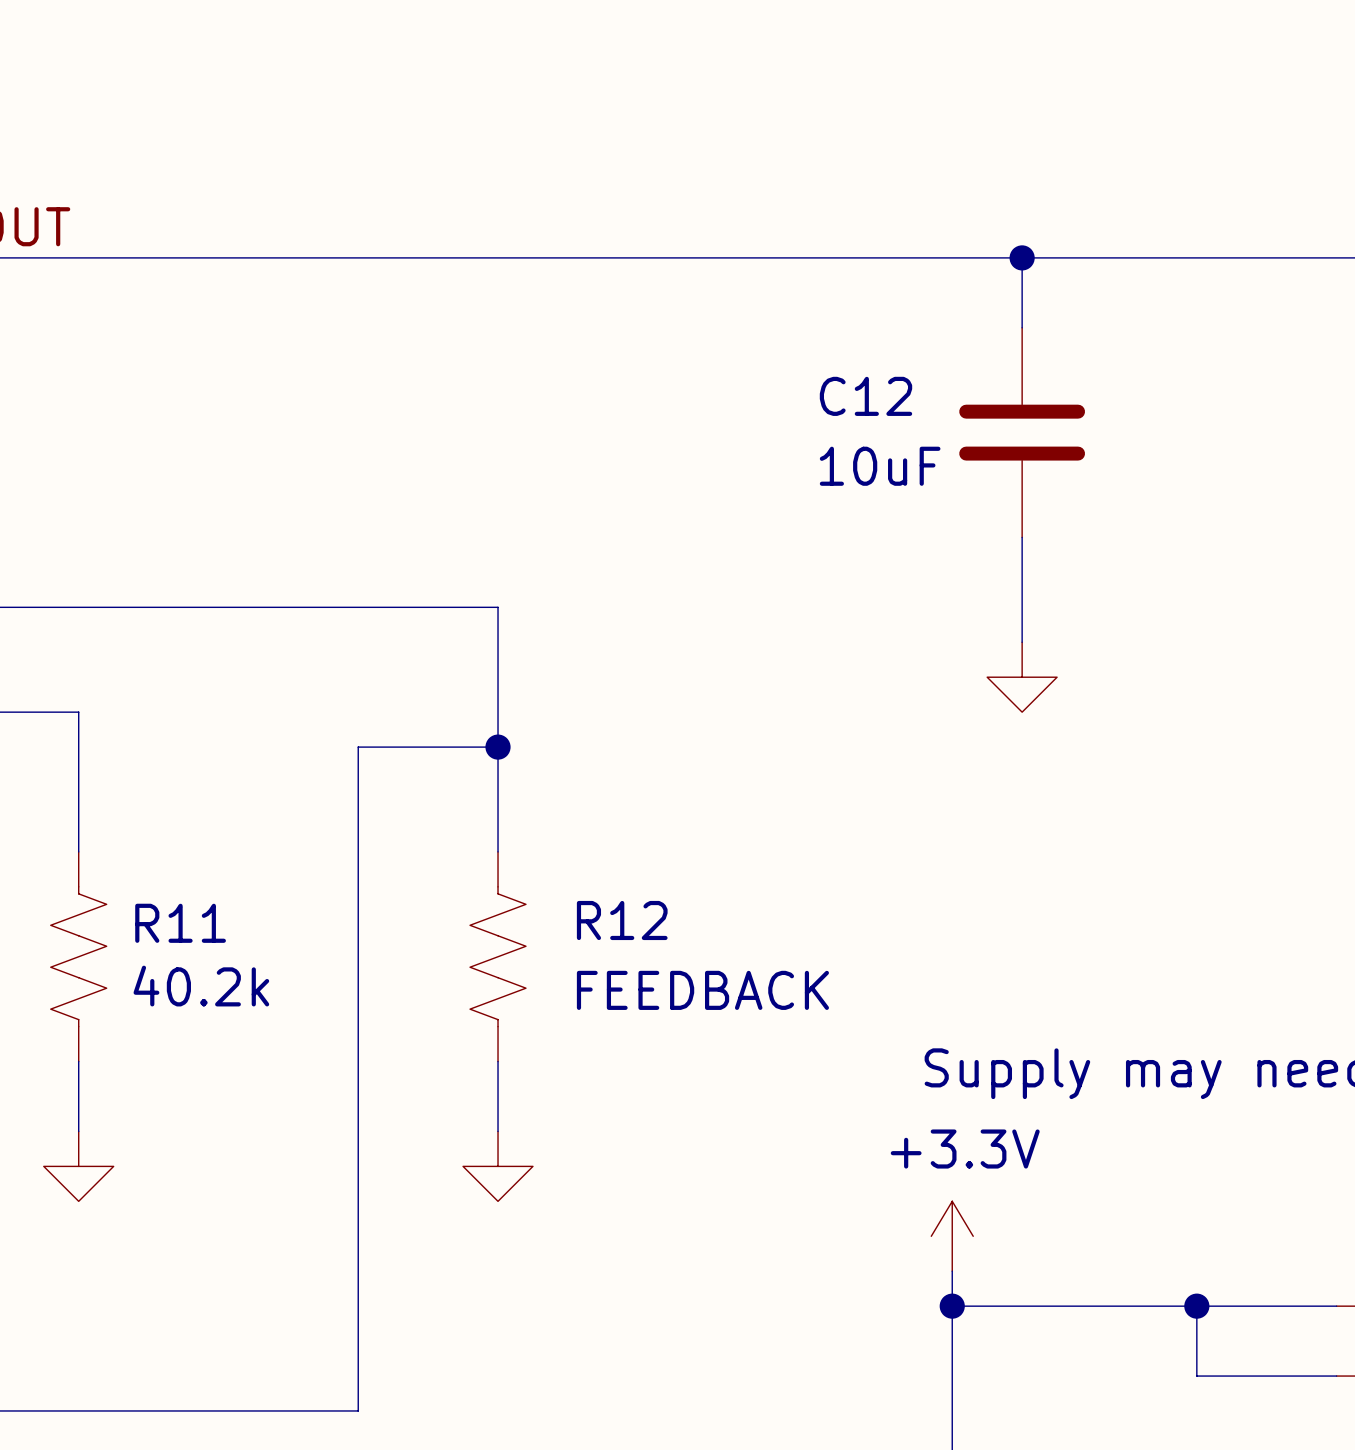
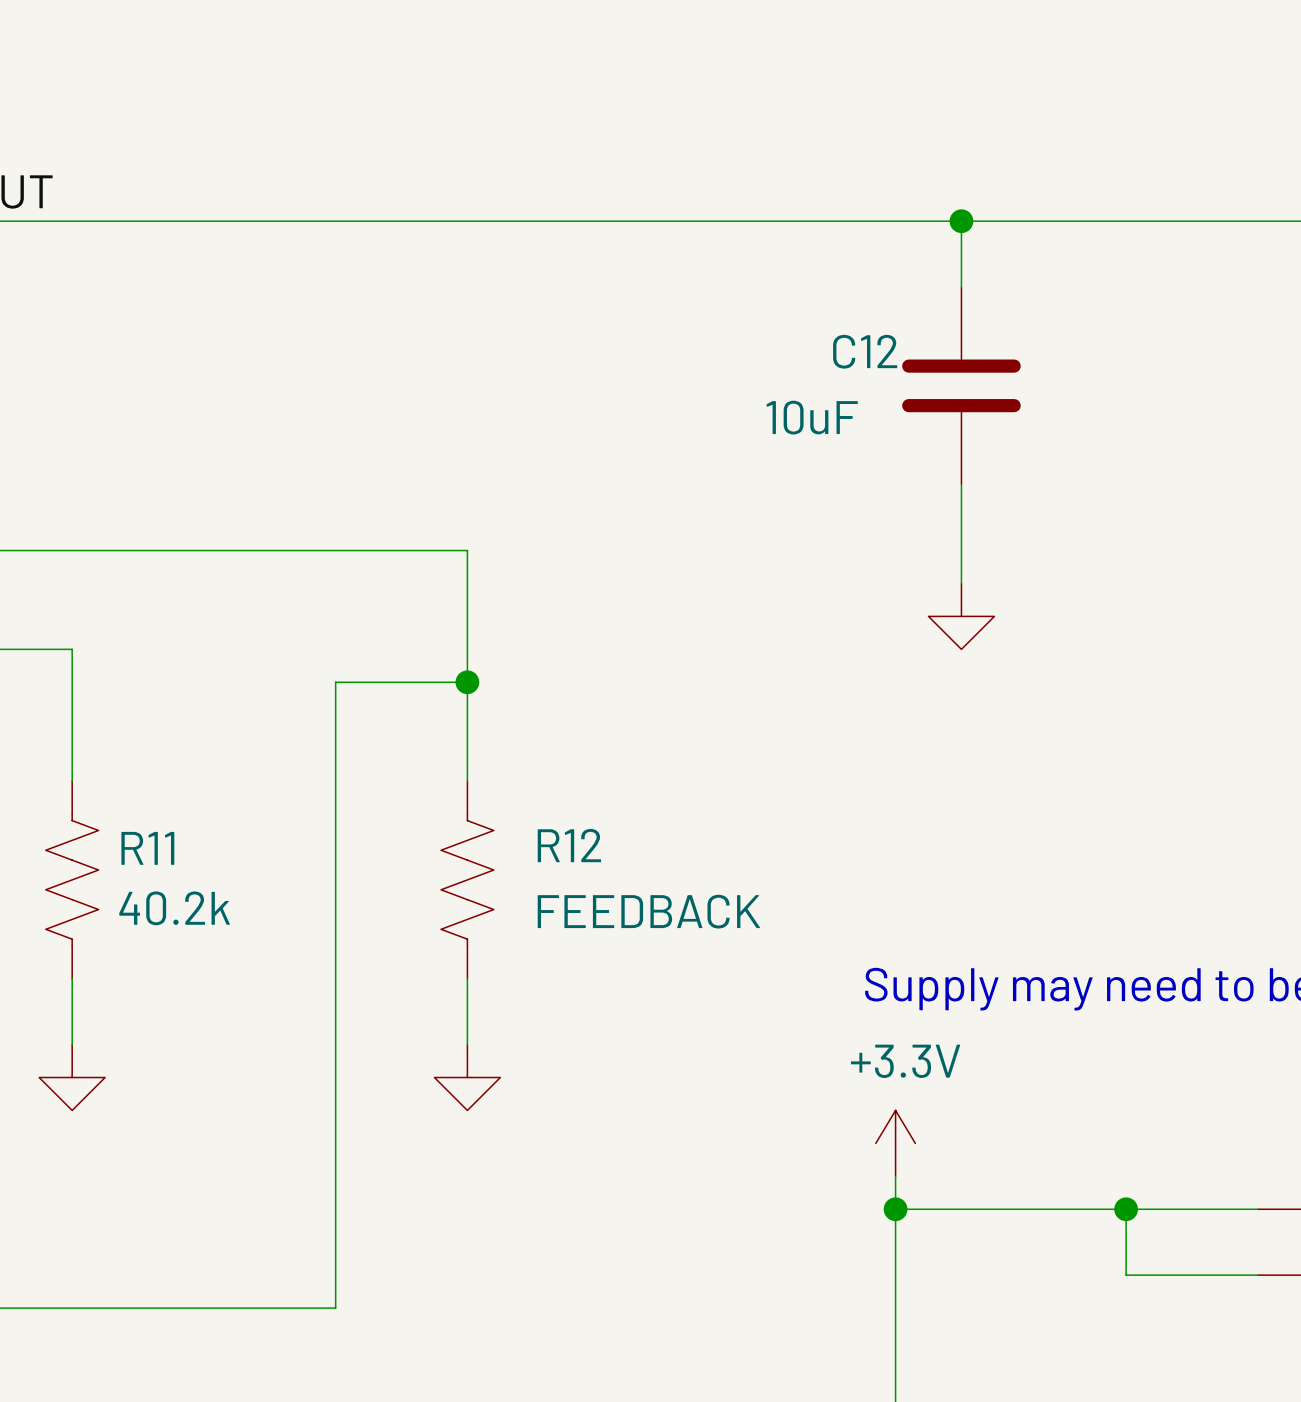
C12 name position: C12 (865, 396) -> C12 (865, 351)

